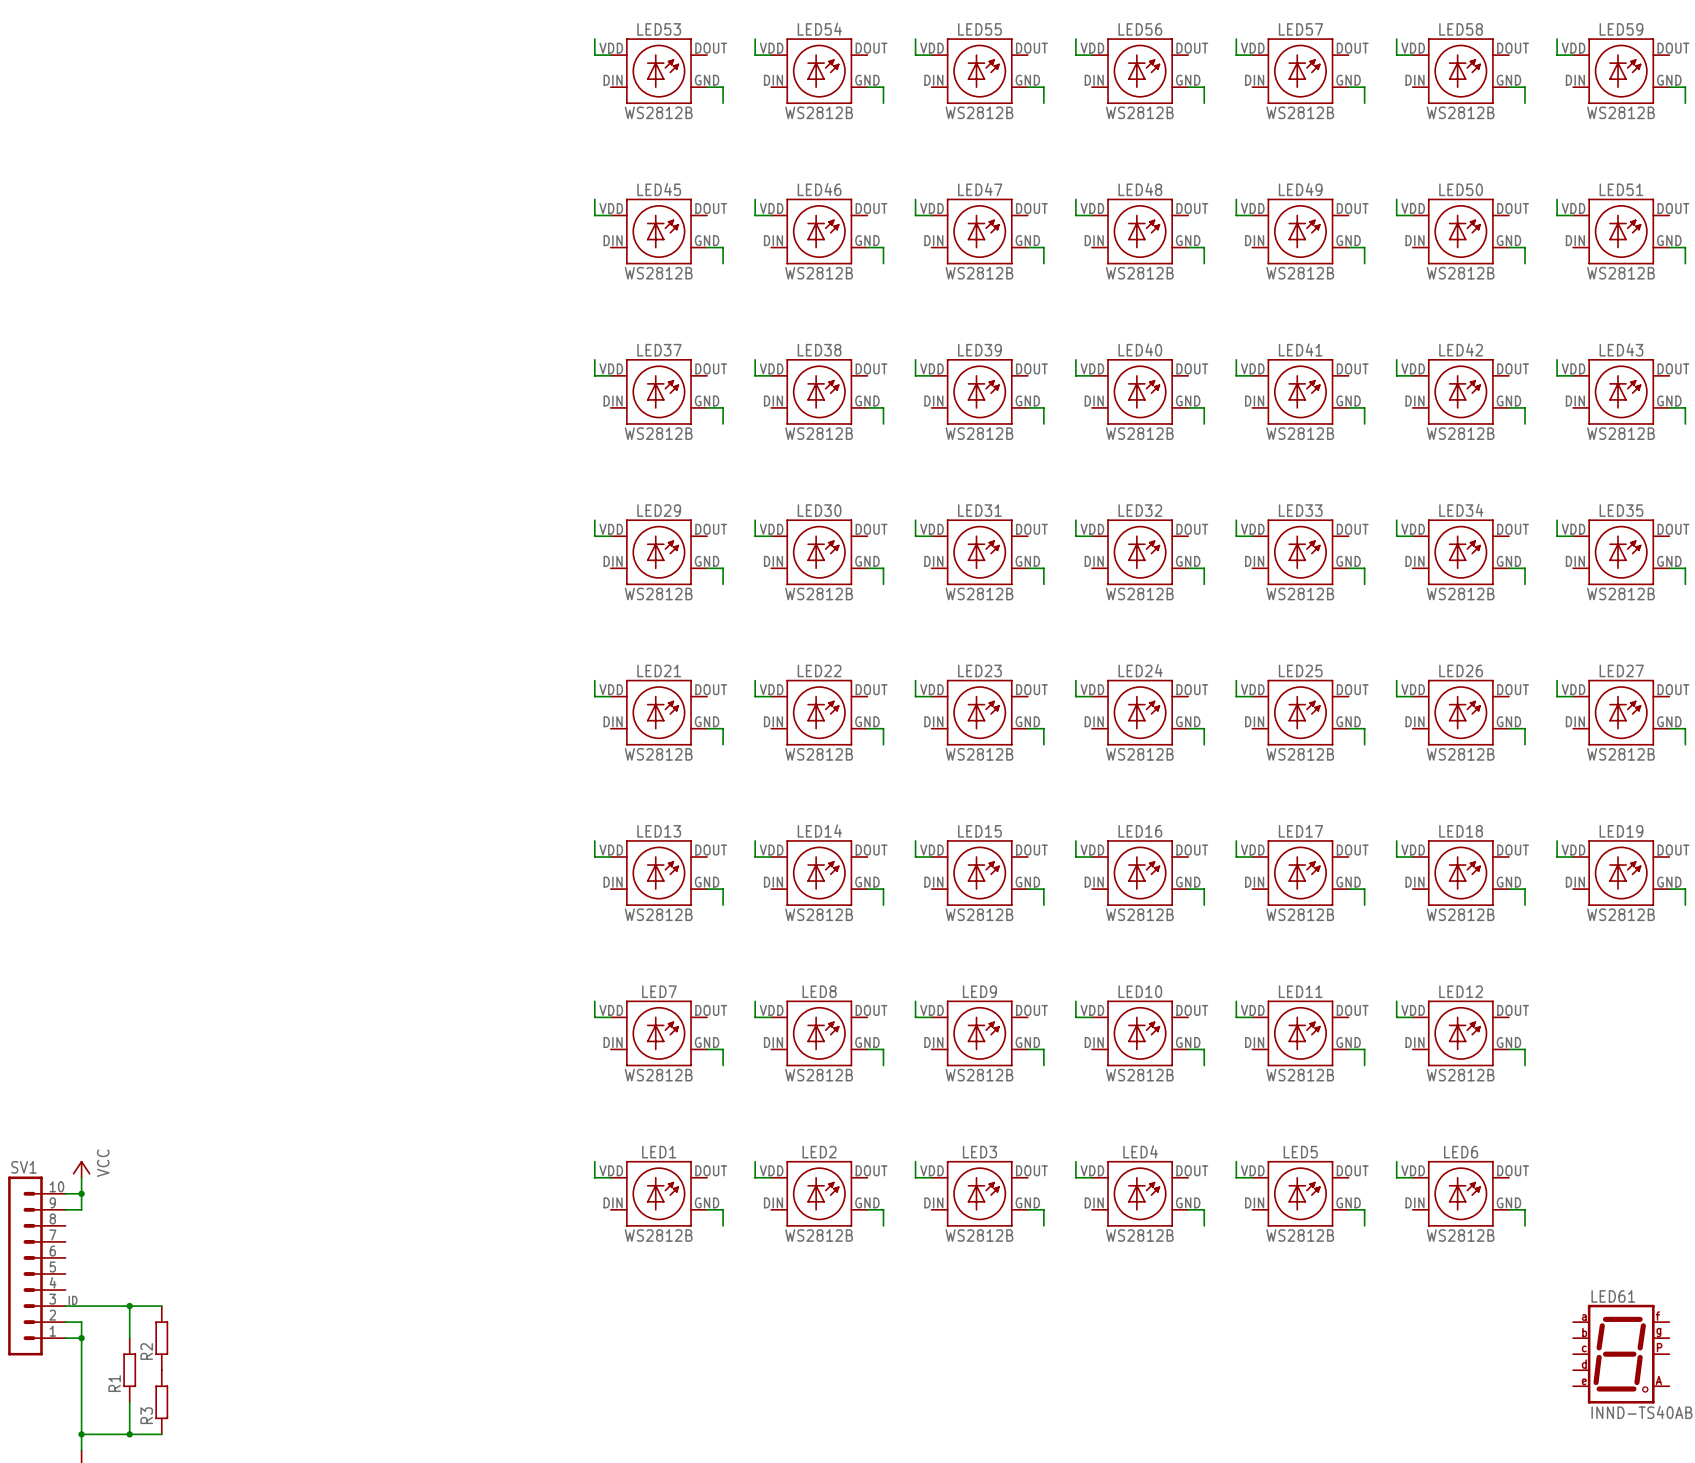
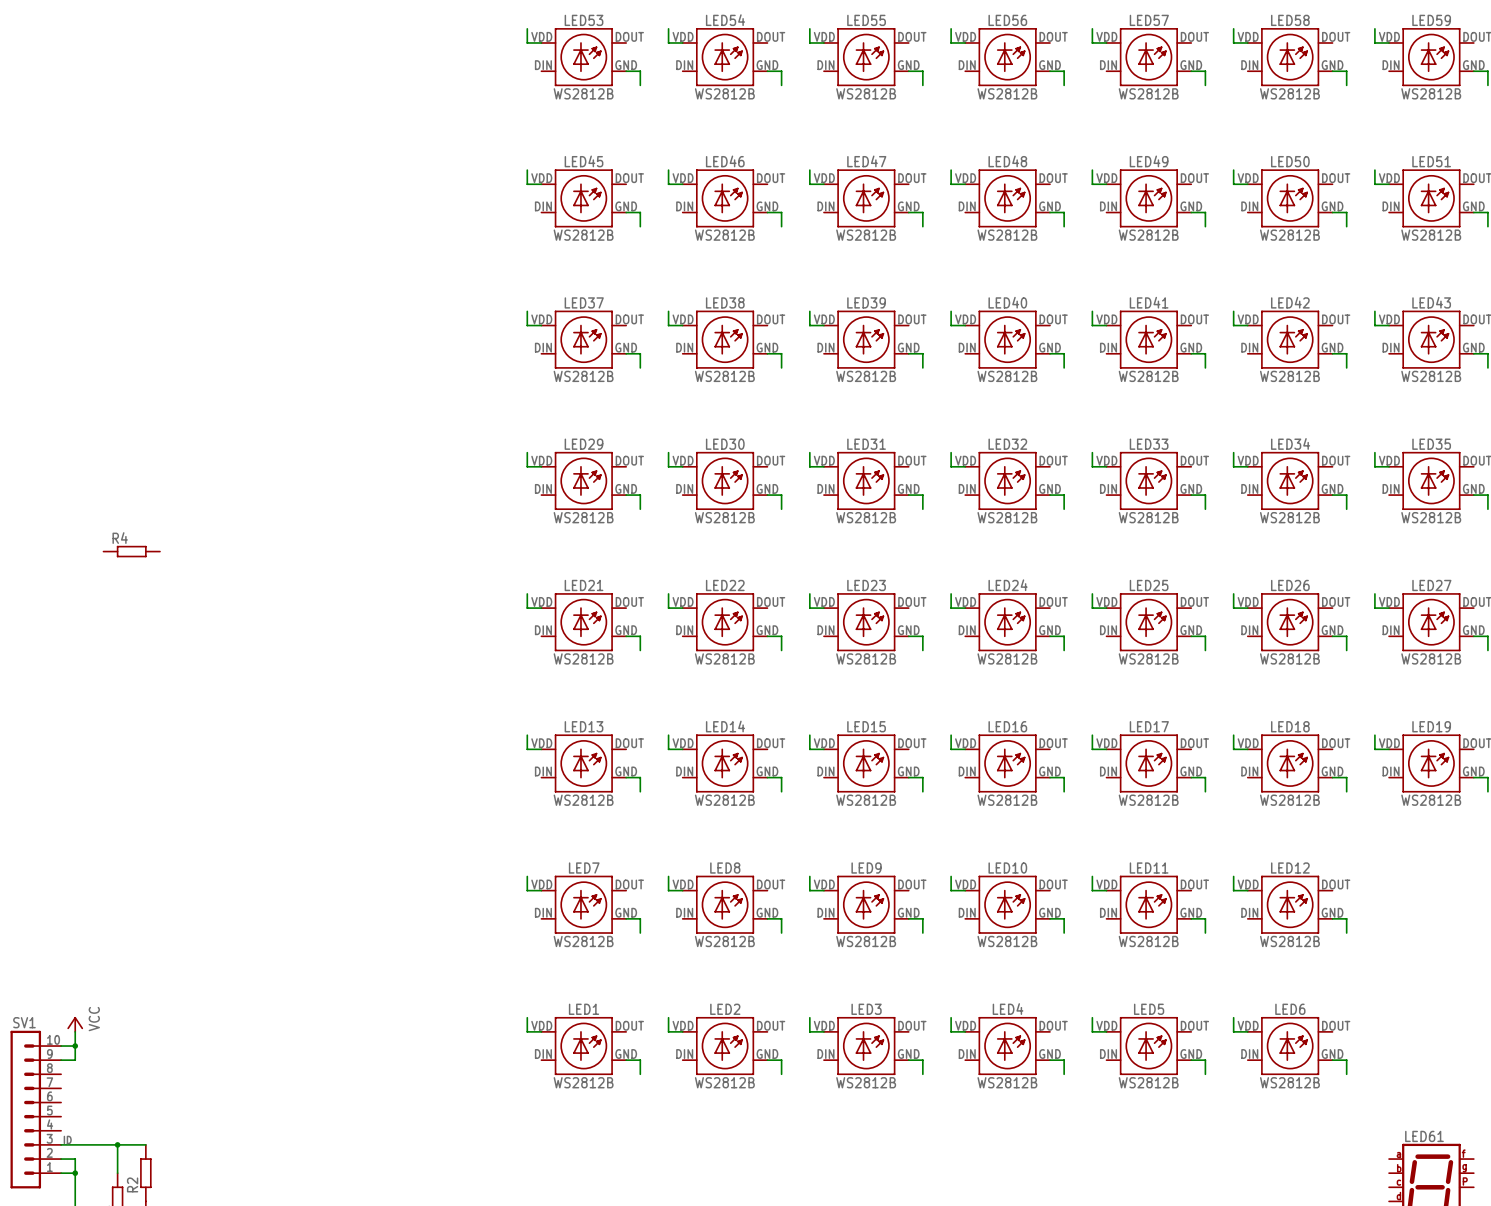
R4: none -> (131, 551)

